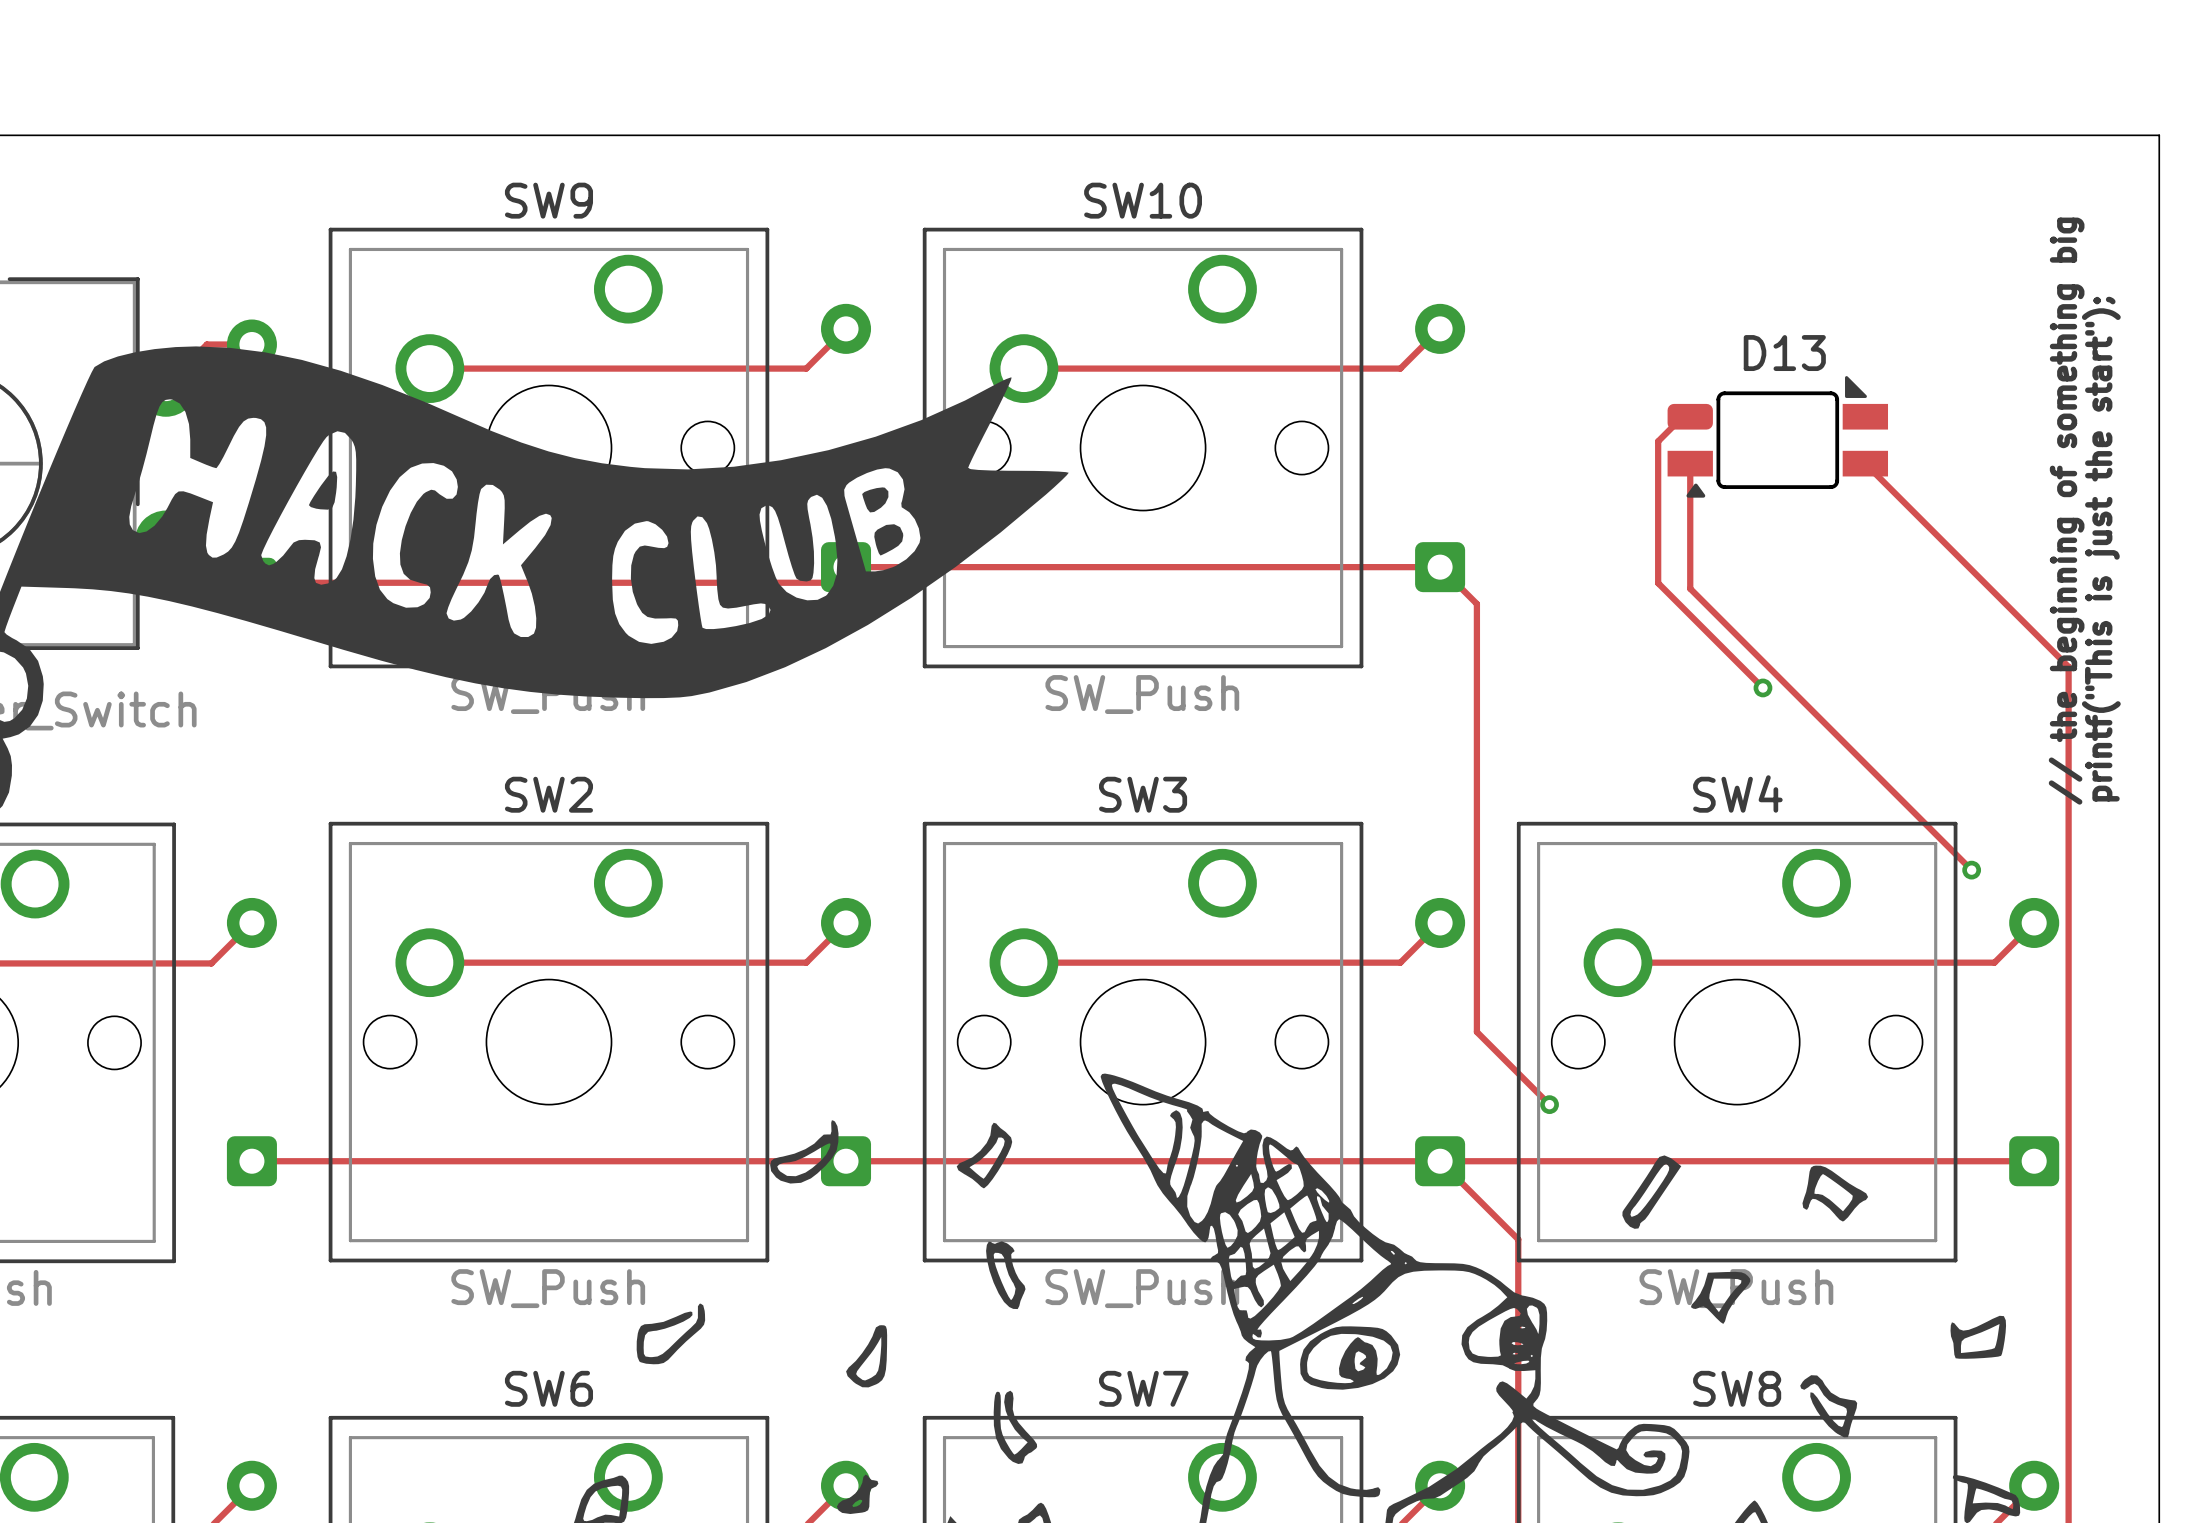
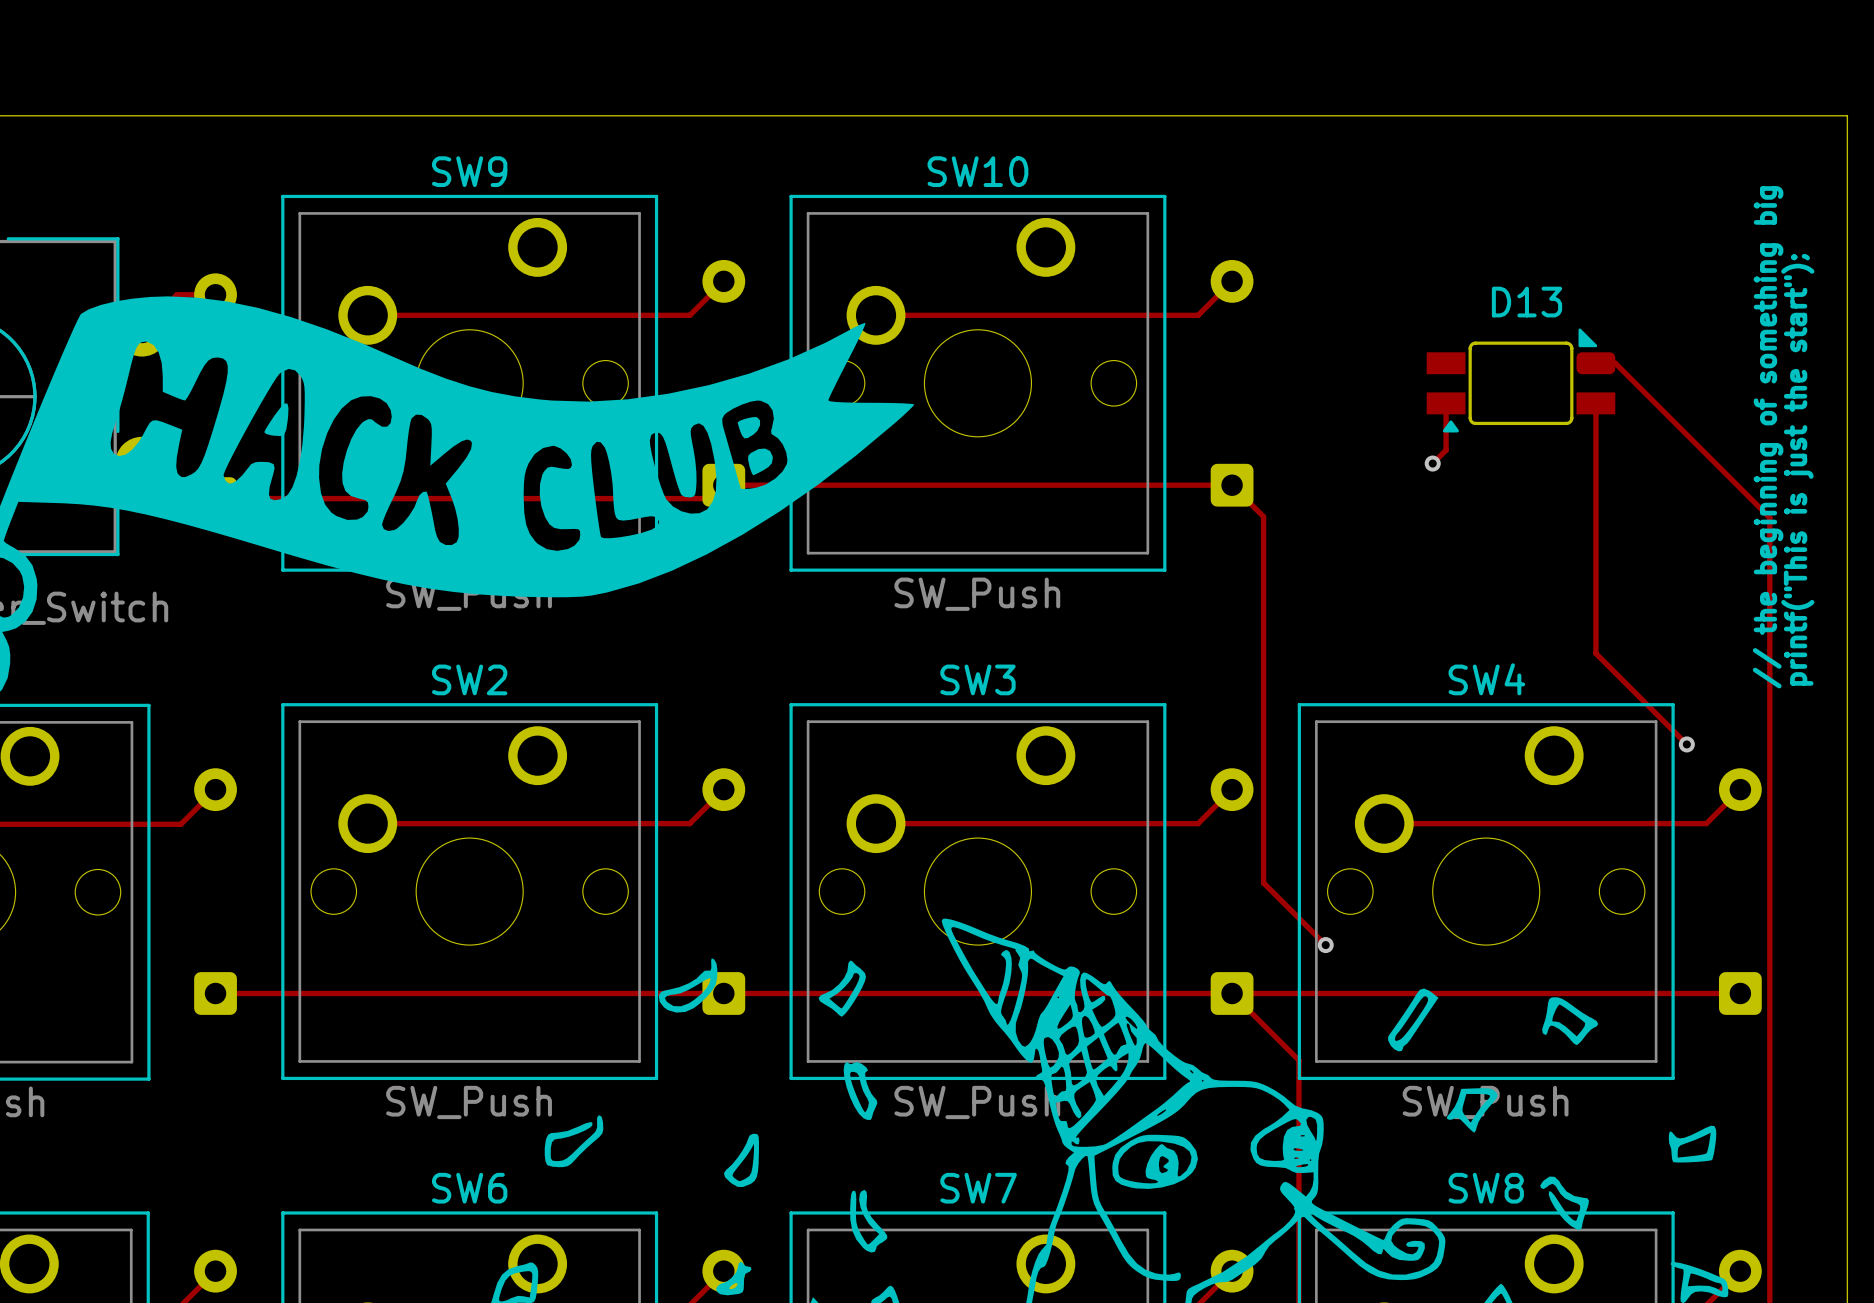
D13 footprint: [1667, 376, 1889, 498] -> [1426, 328, 1616, 433]
track: (1690, 416) (1682, 416) (1658, 441) (1658, 583) (1762, 687) -> none
track: (1865, 463) (2068, 666) -> (1595, 363) (1615, 363) (1769, 517) (1769, 570)
track: (1690, 526) (1690, 588) (1865, 763) -> (1595, 403) (1595, 653)
track: none -> (1446, 450) (1432, 463)
via position: (1762, 687) -> (1432, 463)

